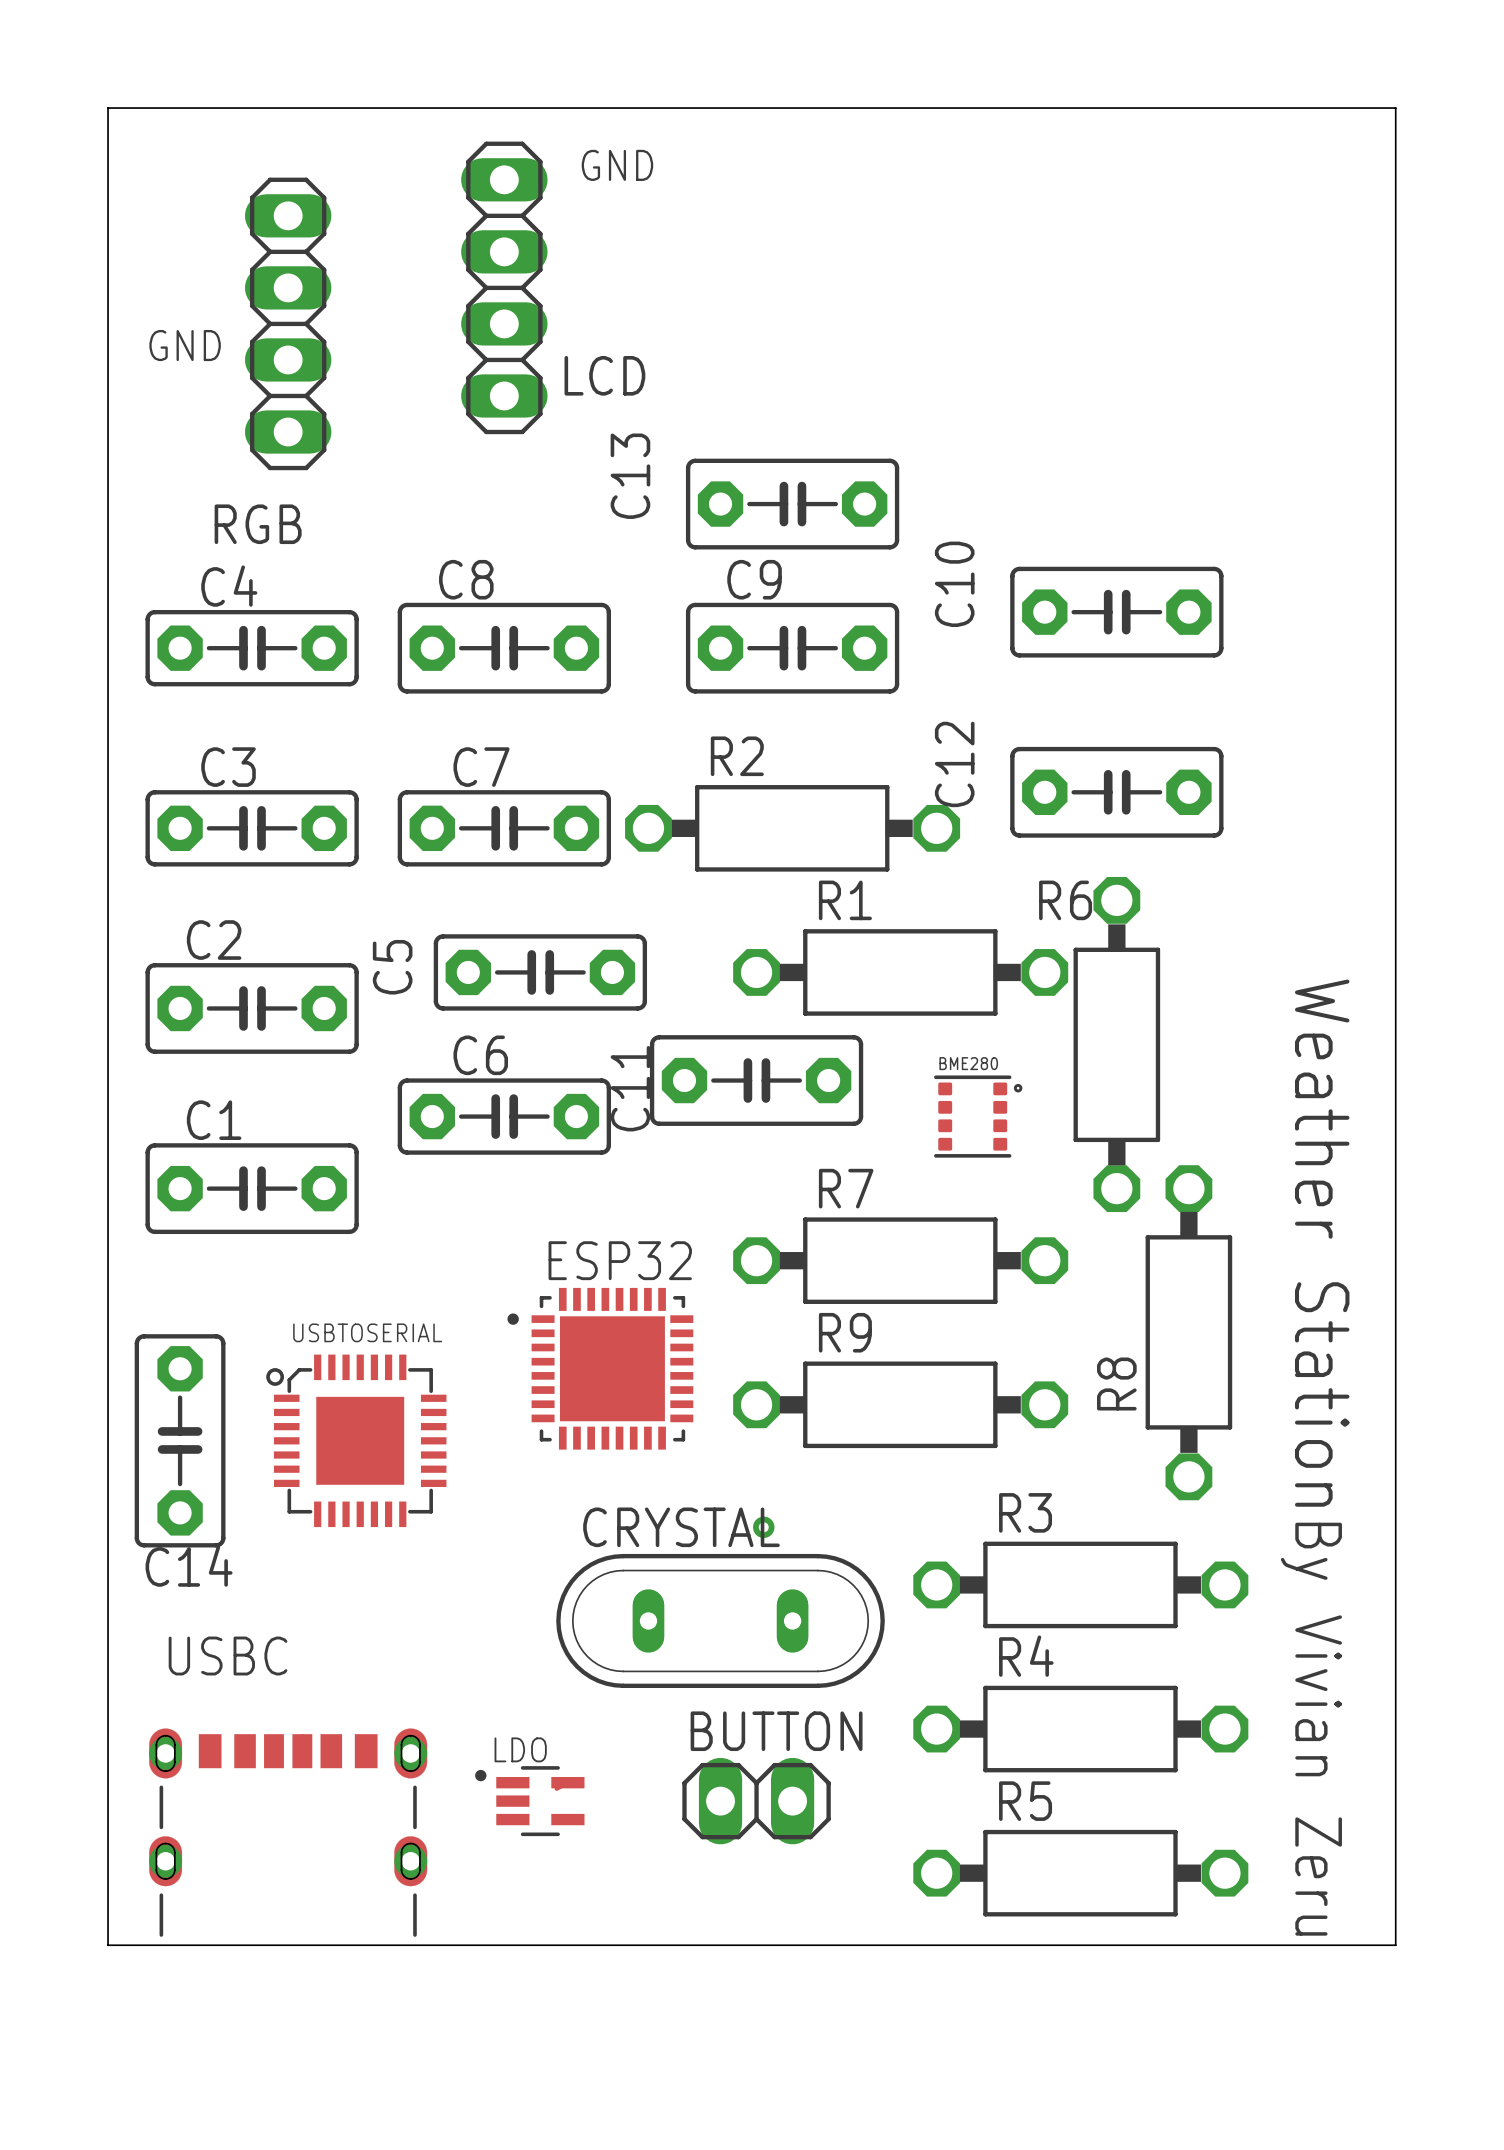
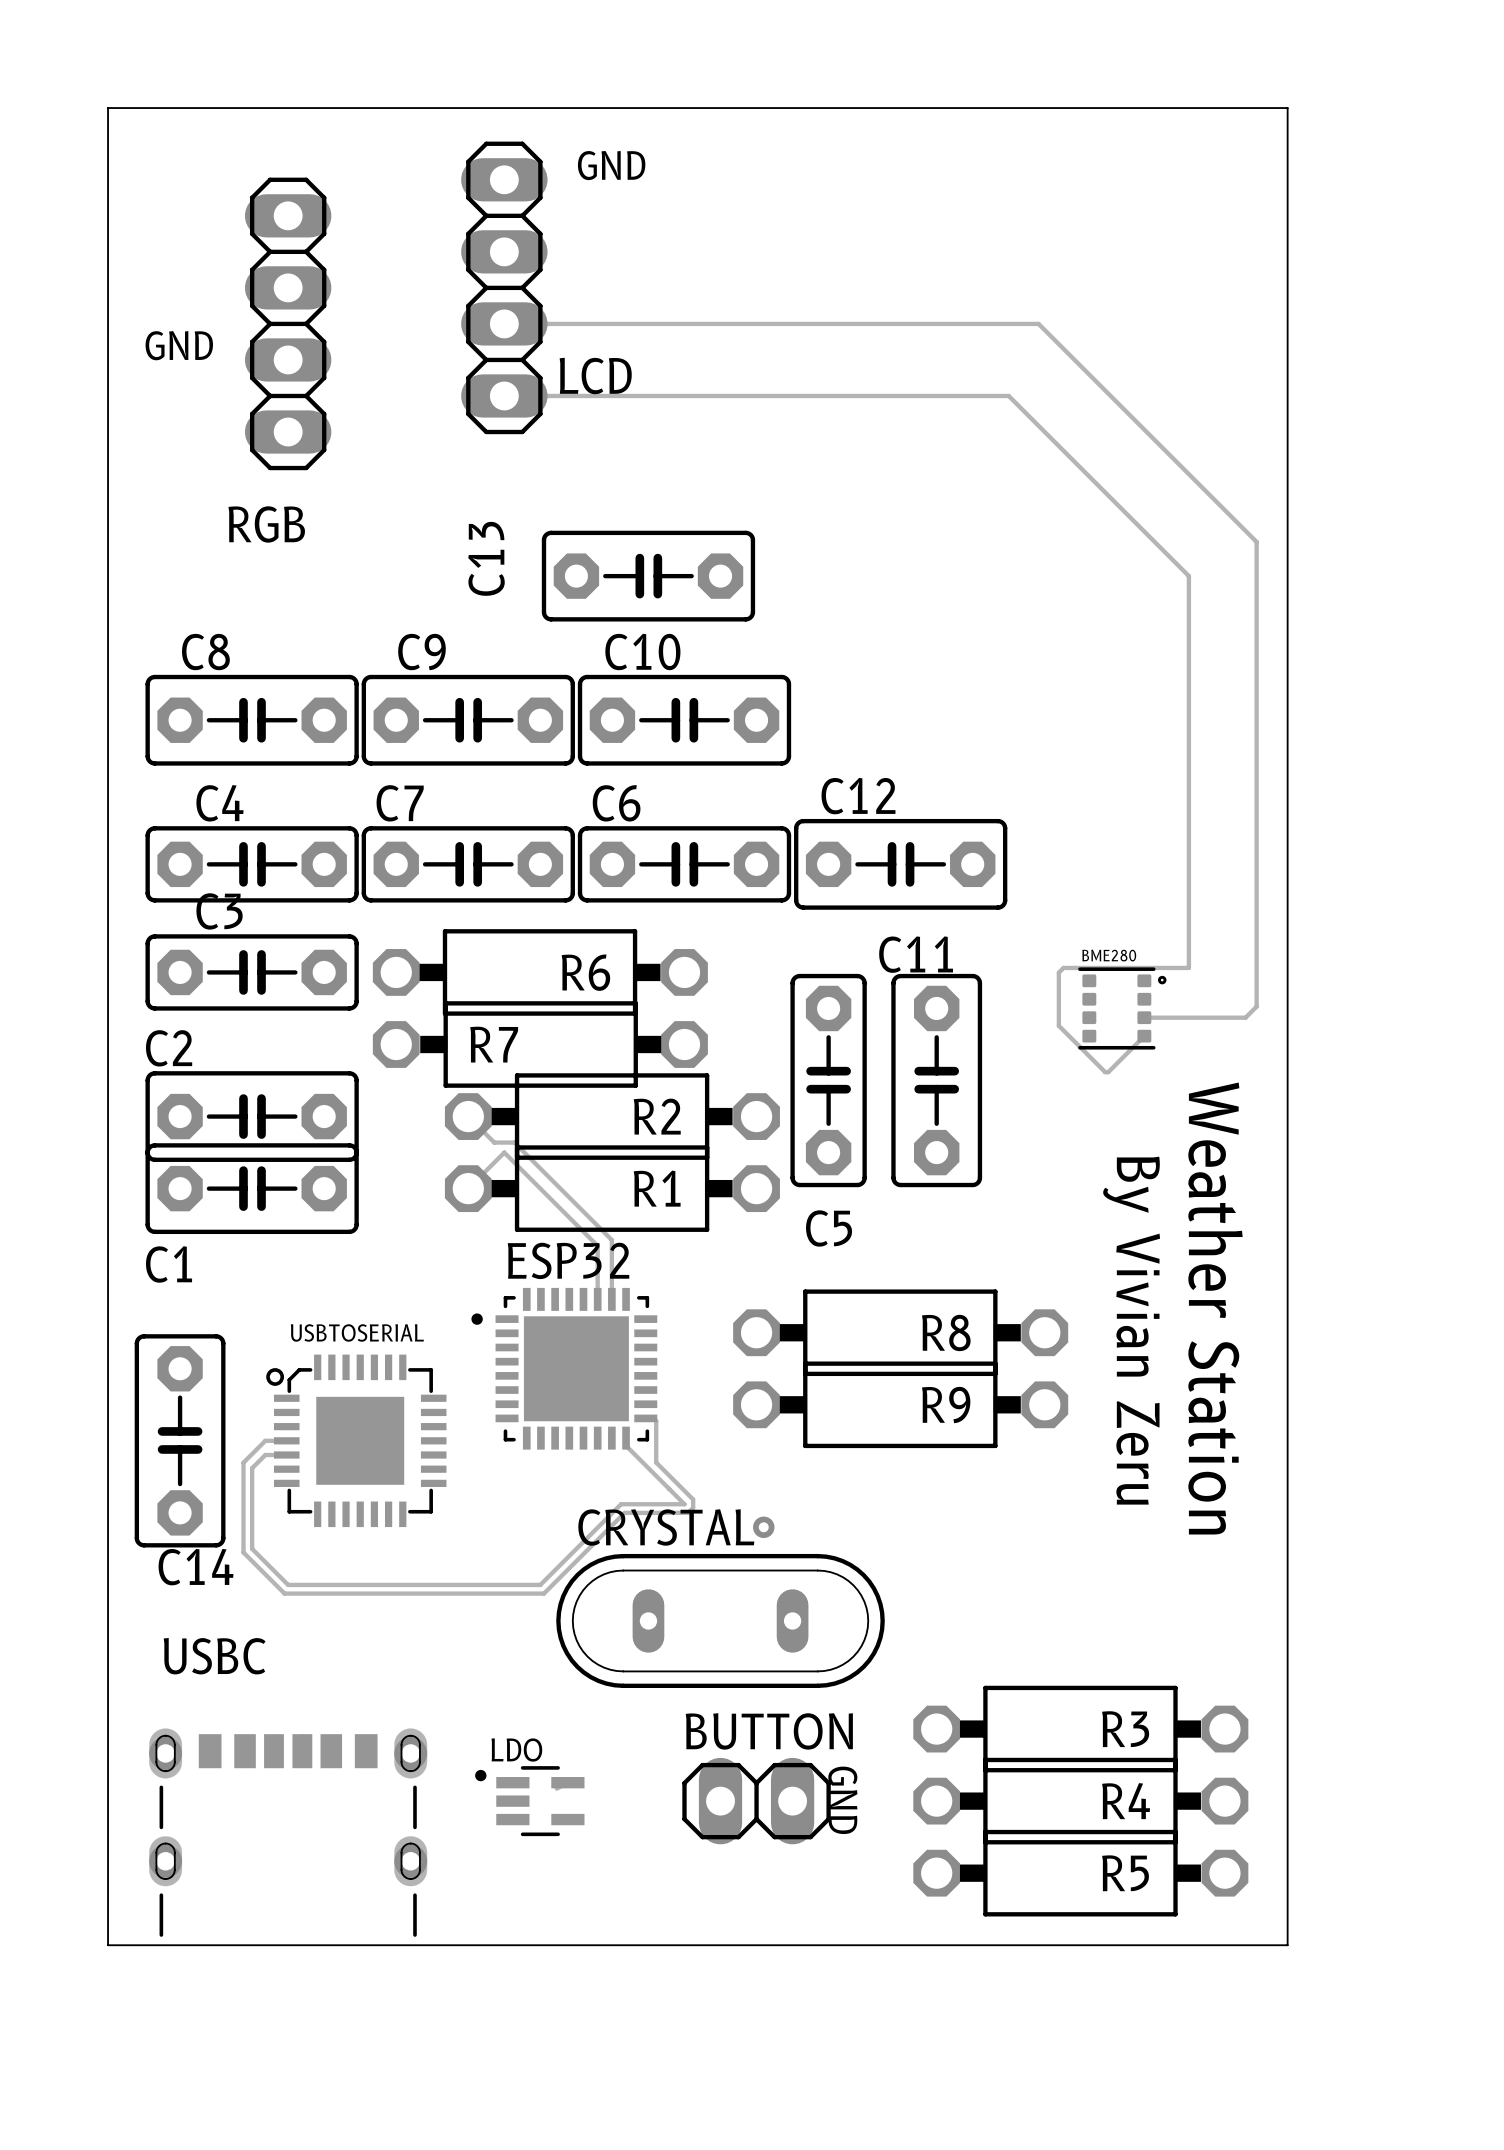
board edge: (1287, 108) (1395, 108) (1395, 1945) (1287, 1945) -> (1287, 108) (1287, 1945)
track: none -> (504, 323) (1038, 323) (1256, 541) (1256, 1006) (1245, 1017) (1144, 1017)
track: none -> (504, 395) (1008, 395) (1188, 576) (1188, 967) (1063, 967) (1058, 972) (1058, 1025) (1105, 1072) (1108, 1072) (1144, 1036) (1145, 1037)
C13 position: (792, 504) -> (648, 576)
C10 name rotation: 0° (954, 584) -> 90° clockwise (642, 651)
C10 position: (1116, 612) -> (684, 720)
C4 position: (252, 648) -> (252, 864)
C8 position: (504, 648) -> (252, 720)
C9 position: (792, 648) -> (468, 720)
R2 name position: R2 (737, 756) -> R2 (657, 1116)
C12 name rotation: 0° (954, 764) -> 90° clockwise (858, 796)
C7 name position: C7 (481, 767) -> C7 (400, 803)
C12 position: (1116, 792) -> (900, 864)
C3 position: (252, 828) -> (252, 972)
C7 position: (504, 828) -> (468, 864)
R2 position: (792, 828) -> (612, 1116)
R1 name position: R1 (845, 900) -> R1 (657, 1188)
R6 name position: R6 (1065, 900) -> R6 (585, 972)
C2 name position: C2 (214, 940) -> C2 (169, 1048)
C5 rotation: 0° (540, 972) -> 90° counterclockwise (828, 1080)
C5 position: (540, 972) -> (828, 1080)
R1 position: (900, 972) -> (612, 1188)
C2 position: (252, 1008) -> (252, 1116)
R6 rotation: 0° (1116, 1044) -> 90° clockwise (540, 972)
R6 position: (1116, 1044) -> (540, 972)
C6 name position: C6 (480, 1055) -> C6 (616, 803)
C11 rotation: 0° (756, 1080) -> 90° counterclockwise (936, 1080)
C11 position: (756, 1080) -> (936, 1080)
C11 name position: C11 (630, 1088) -> C11 (916, 954)
track: none -> (468, 1116) (494, 1142) (514, 1142) (611, 1240) (611, 1299)
C6 position: (504, 1116) -> (684, 864)
BME280 position: (978, 1116) -> (1122, 1008)
C1 name position: C1 (214, 1120) -> C1 (169, 1264)
track: none -> (468, 1188) (504, 1152) (597, 1245) (597, 1299) (598, 1296)
R7 name position: R7 (846, 1188) -> R7 (494, 1044)
text position: Weather Station (1322, 1243) -> Weather Station (1215, 1308)
R7 position: (900, 1260) -> (540, 1044)
R9 name position: R9 (845, 1332) -> R9 (946, 1405)
R8 rotation: 0° (1188, 1332) -> 90° clockwise (900, 1332)
R8 position: (1188, 1332) -> (900, 1332)
ESP32 position: (600, 1368) -> (564, 1368)
R8 name position: R8 (1116, 1384) -> R8 (946, 1332)
track: none -> (645, 1418) (653, 1418) (656, 1421) (656, 1462) (693, 1499) (693, 1507) (688, 1512) (624, 1512) (543, 1593) (284, 1593) (243, 1552) (243, 1462) (265, 1440) (286, 1440)
track: none -> (626, 1438) (626, 1445) (684, 1504) (621, 1504) (540, 1584) (288, 1584) (252, 1548) (252, 1468) (265, 1455) (286, 1455)
R3: (1080, 1584) -> none
R4 name: R4 (1026, 1656) -> R3 (1125, 1729)
text position: By Vivian Zeru (1311, 1729) -> By Vivian Zeru (1131, 1330)
R5 name position: R5 (1025, 1801) -> R5 (1125, 1873)
R4: none -> (1080, 1801)
text: none -> GND (842, 1800)

